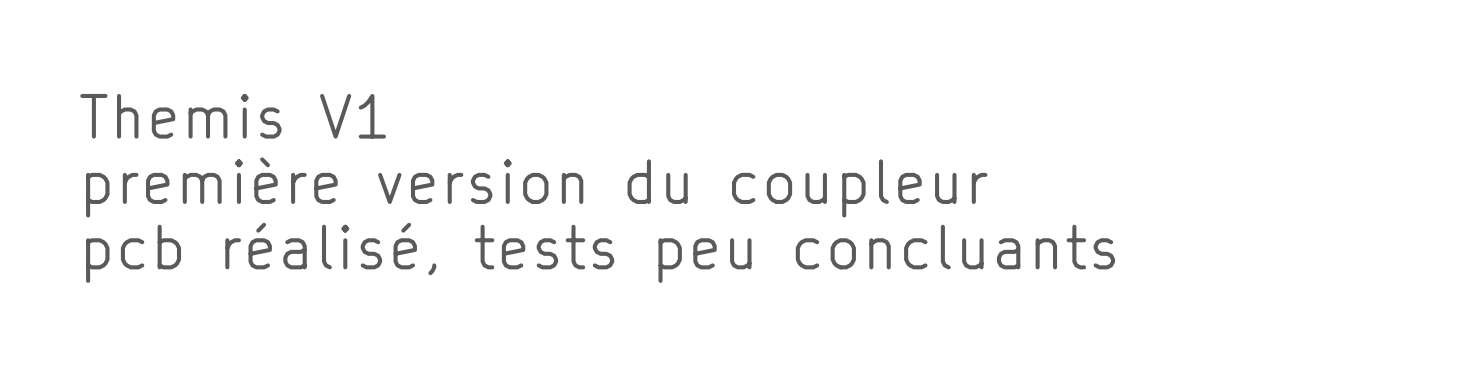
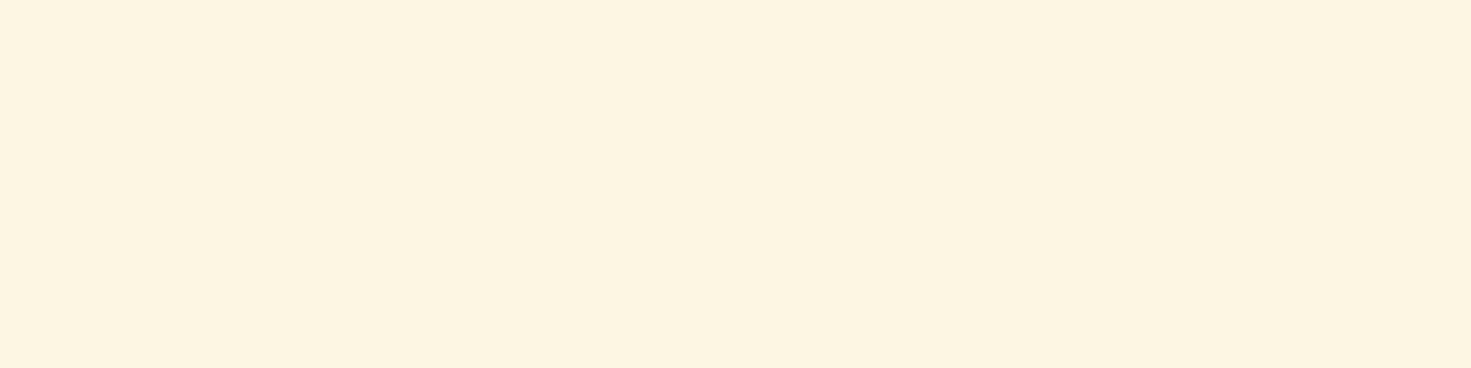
text: Themis V1 (233, 116) -> none
text: première version du coupleur (536, 187) -> none
text: pcb réalisé, tests peu concluants (600, 252) -> none

